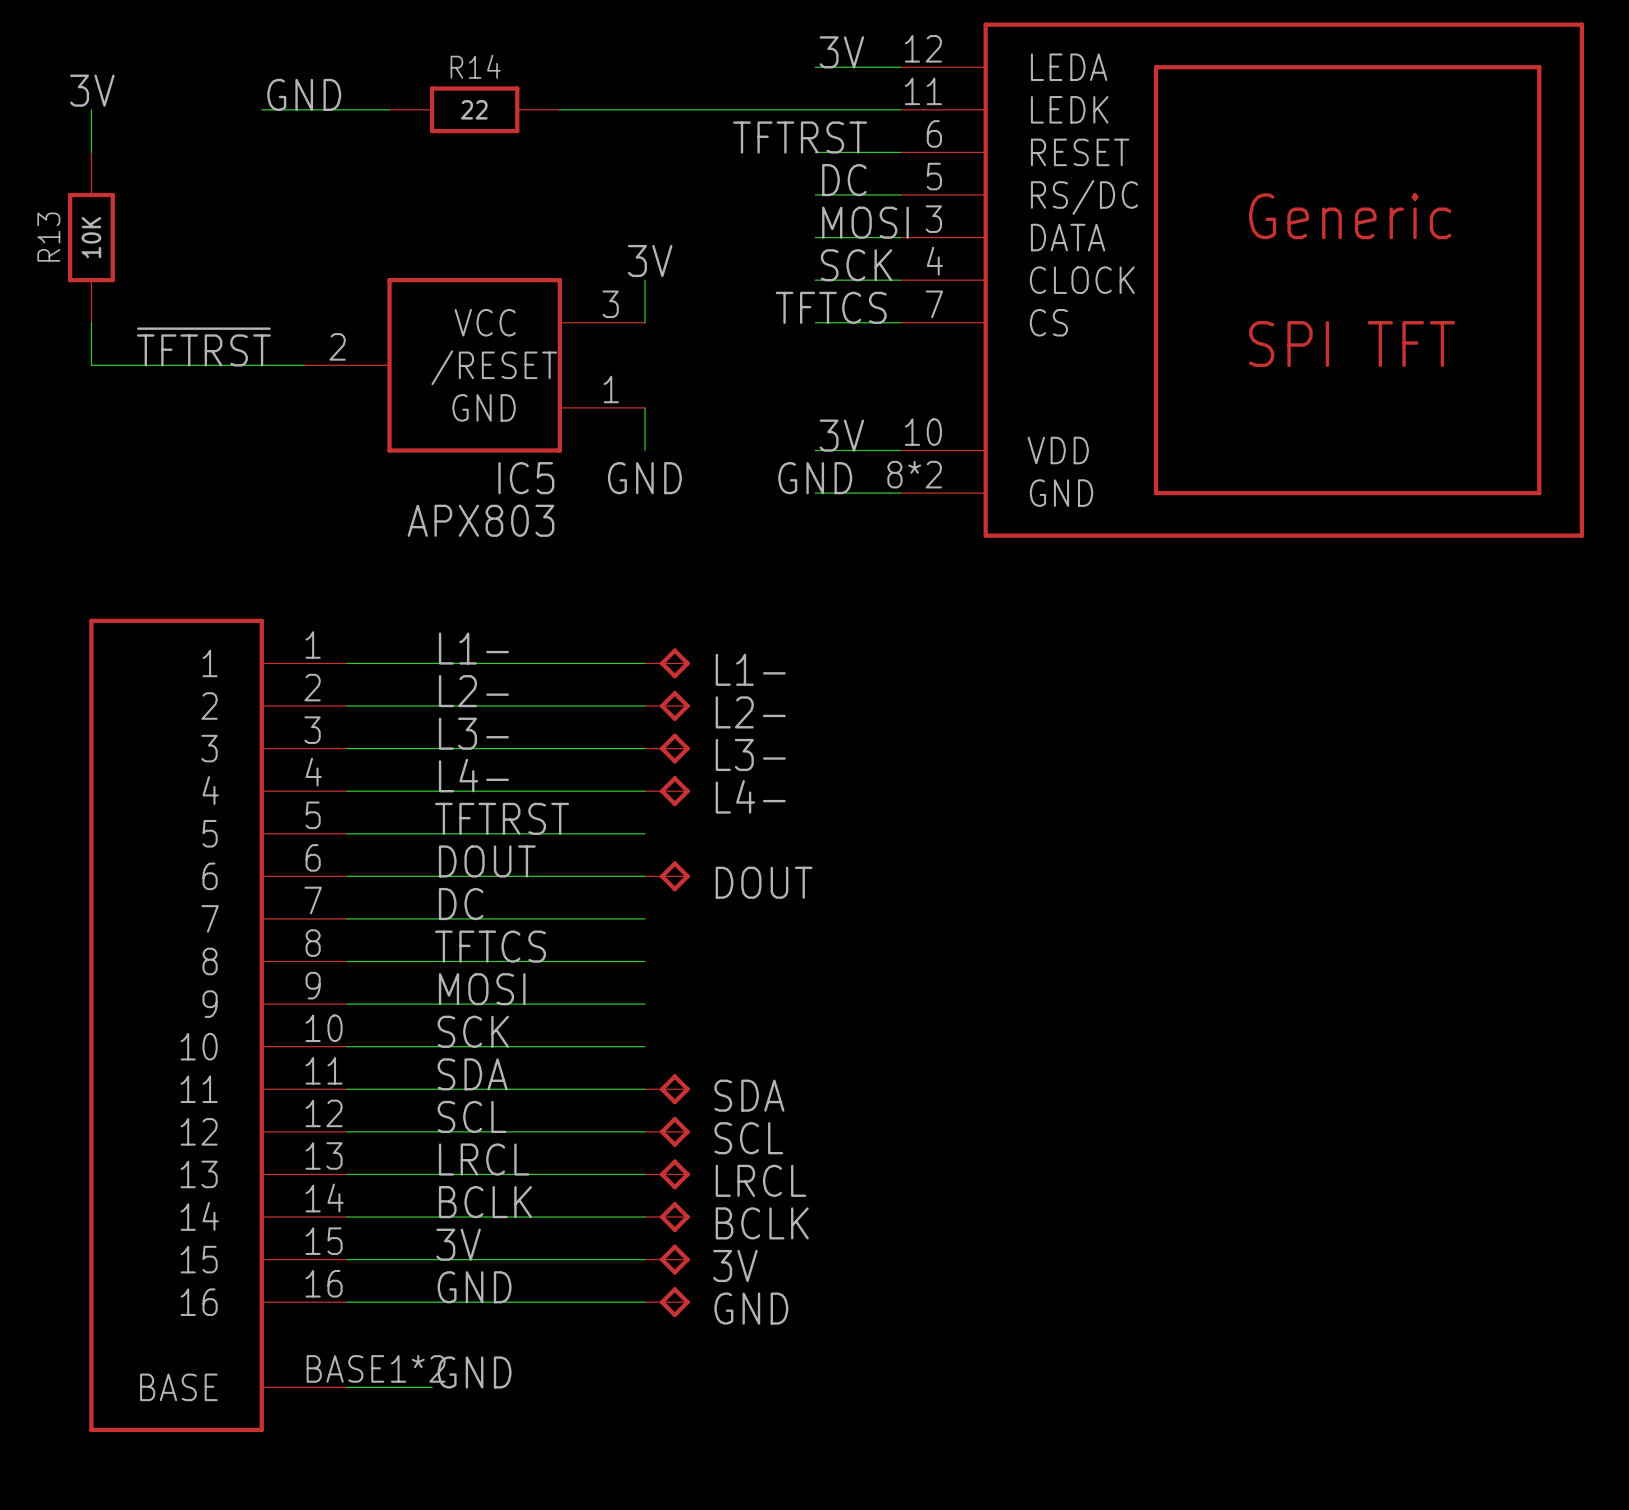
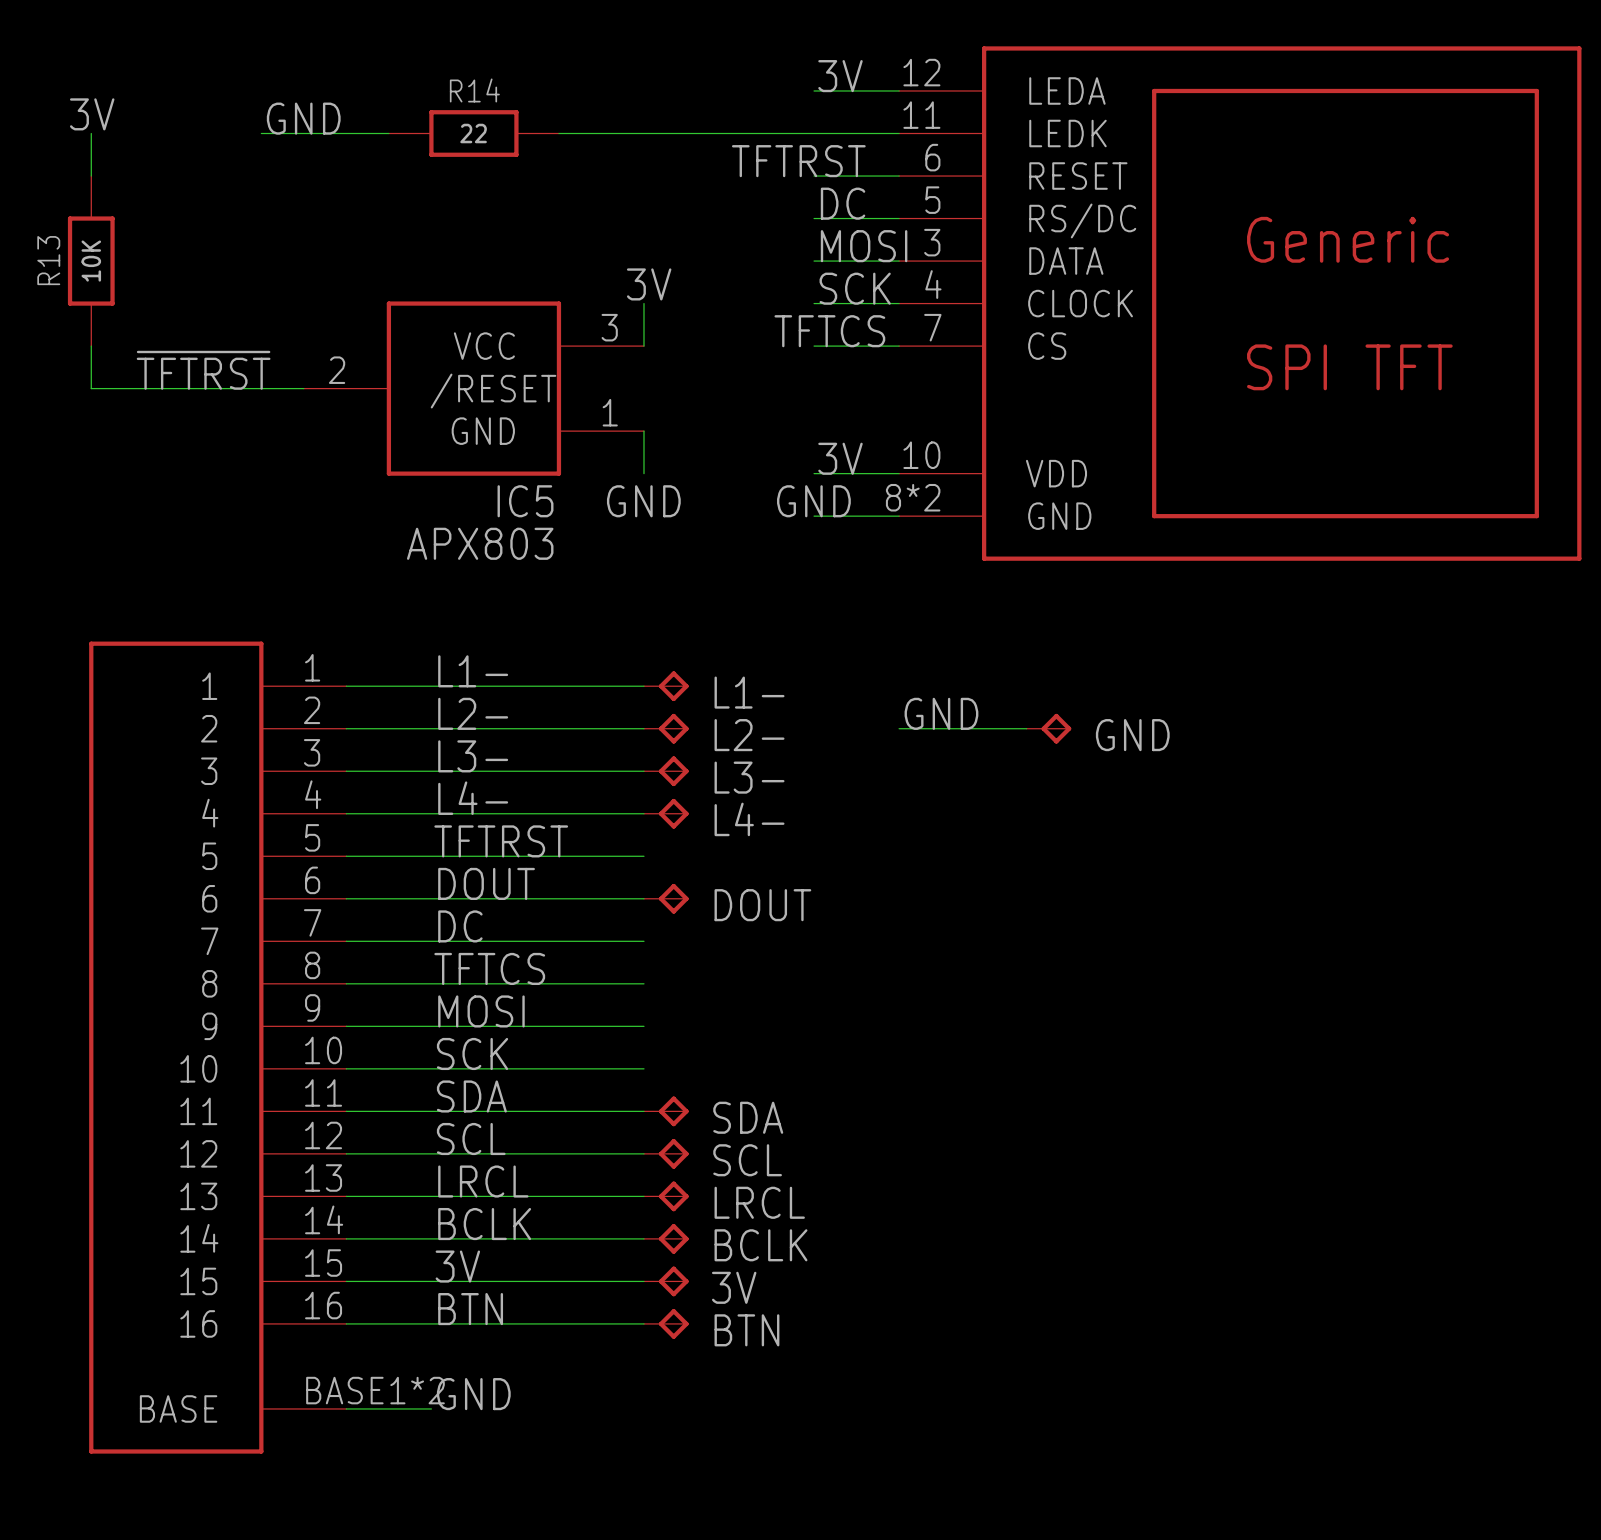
label: none -> GND (941, 713)
wire: none -> (899, 728) (1026, 728)
GND: none -> (1048, 728)
label: GND (474, 1287) -> BTN (470, 1309)
GND name: GND (751, 1308) -> BTN (746, 1330)

